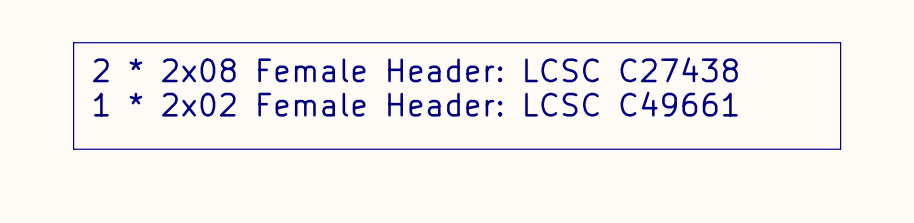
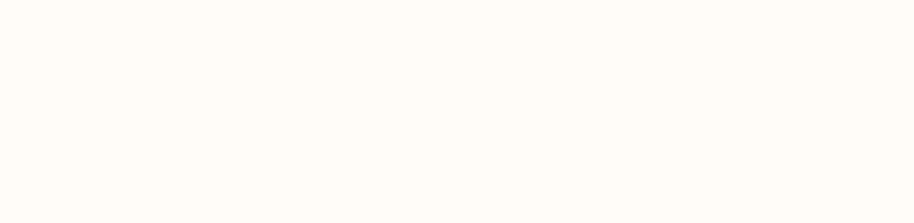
line: (73, 42) (840, 42) (840, 149) (73, 149) (73, 42) -> none
text: 2 * 2x08 Female Header: LCSC C27438 (415, 69) -> none
text: 1 * 2x02 Female Header: LCSC C49661 (415, 104) -> none

